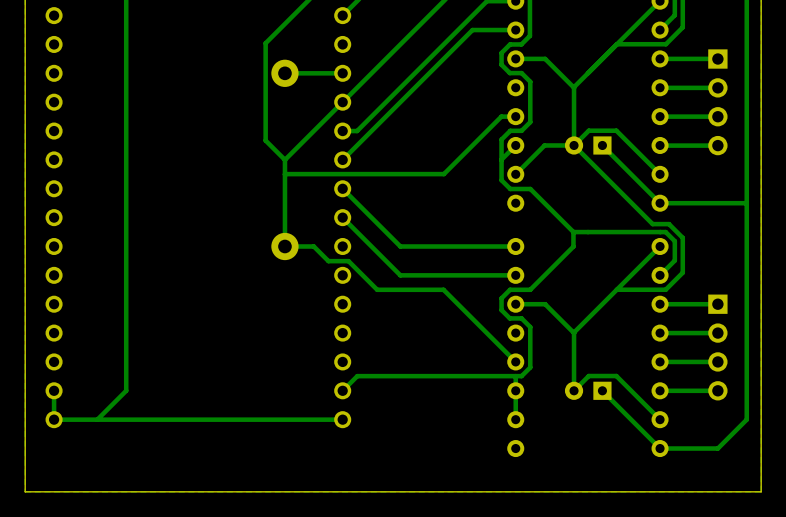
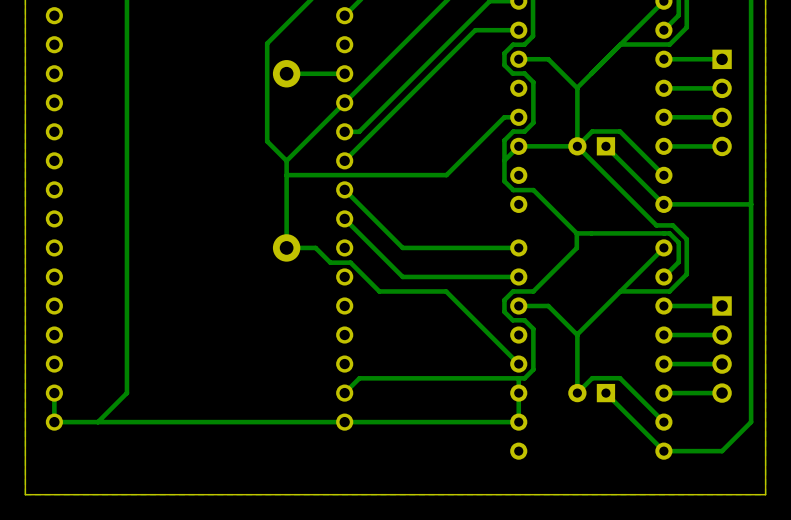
track: (544, 145) (515, 174) -> (547, 146) (518, 146)
track: none -> (518, 422) (344, 422)

